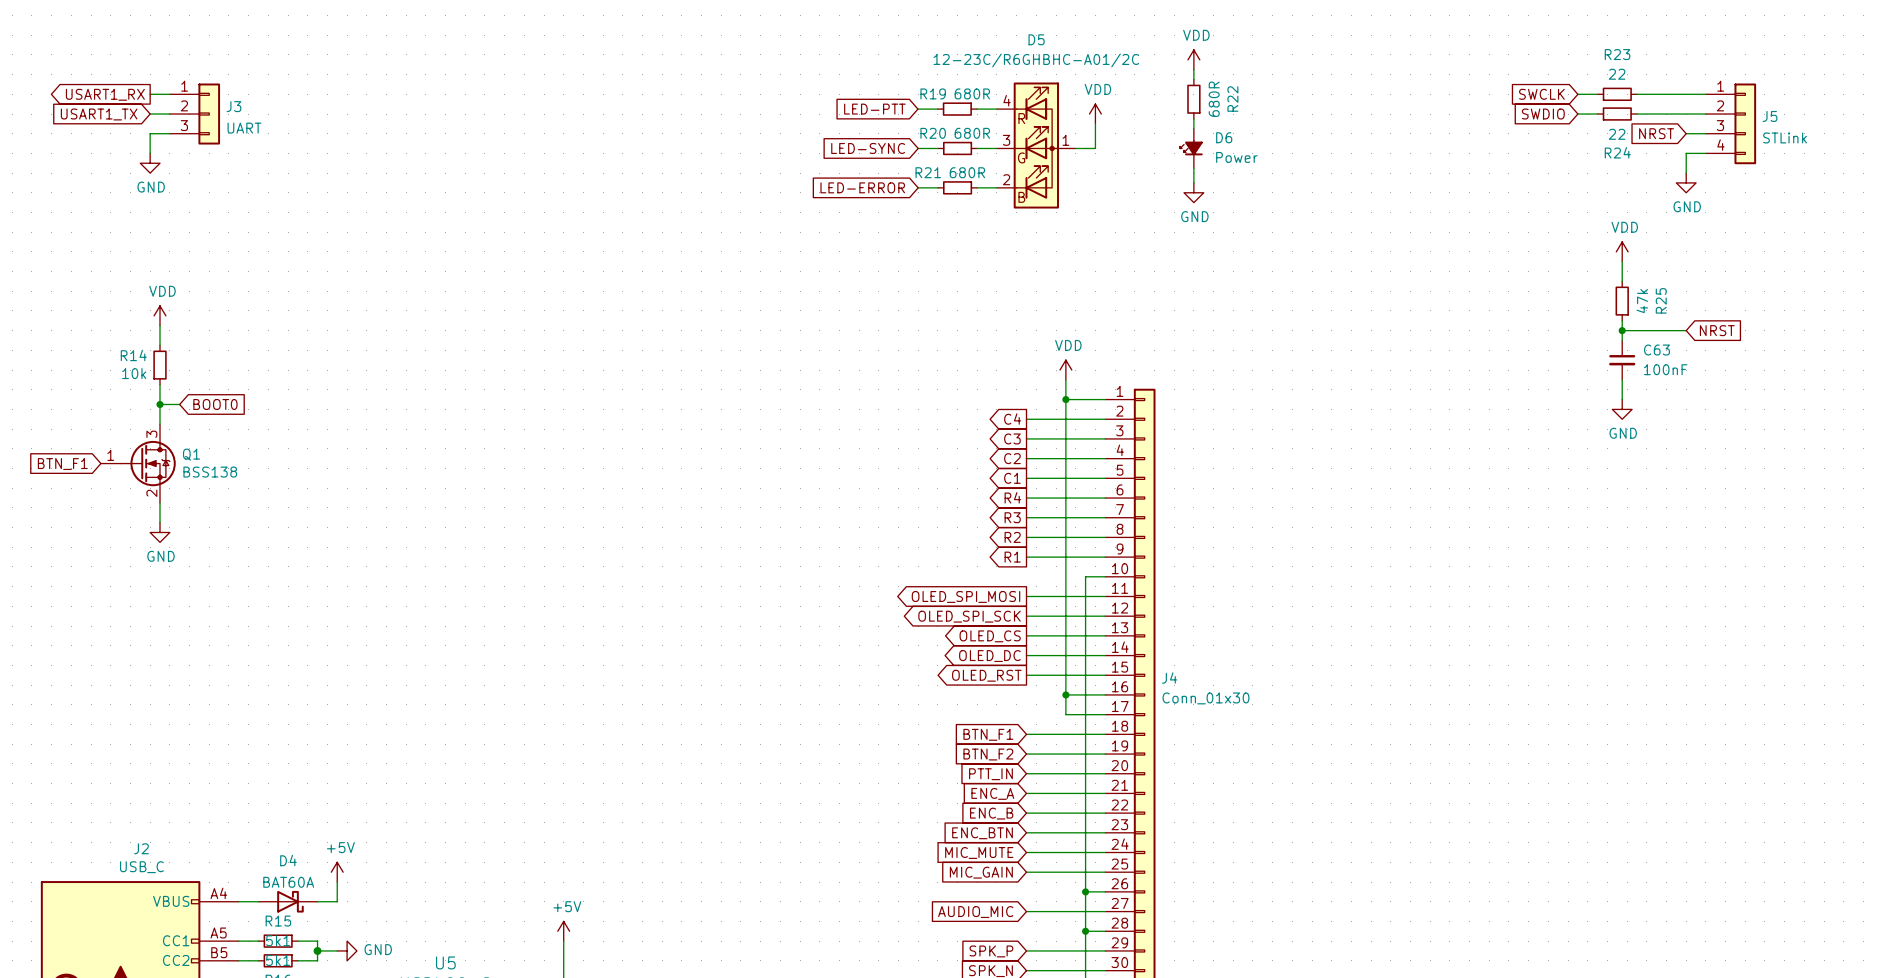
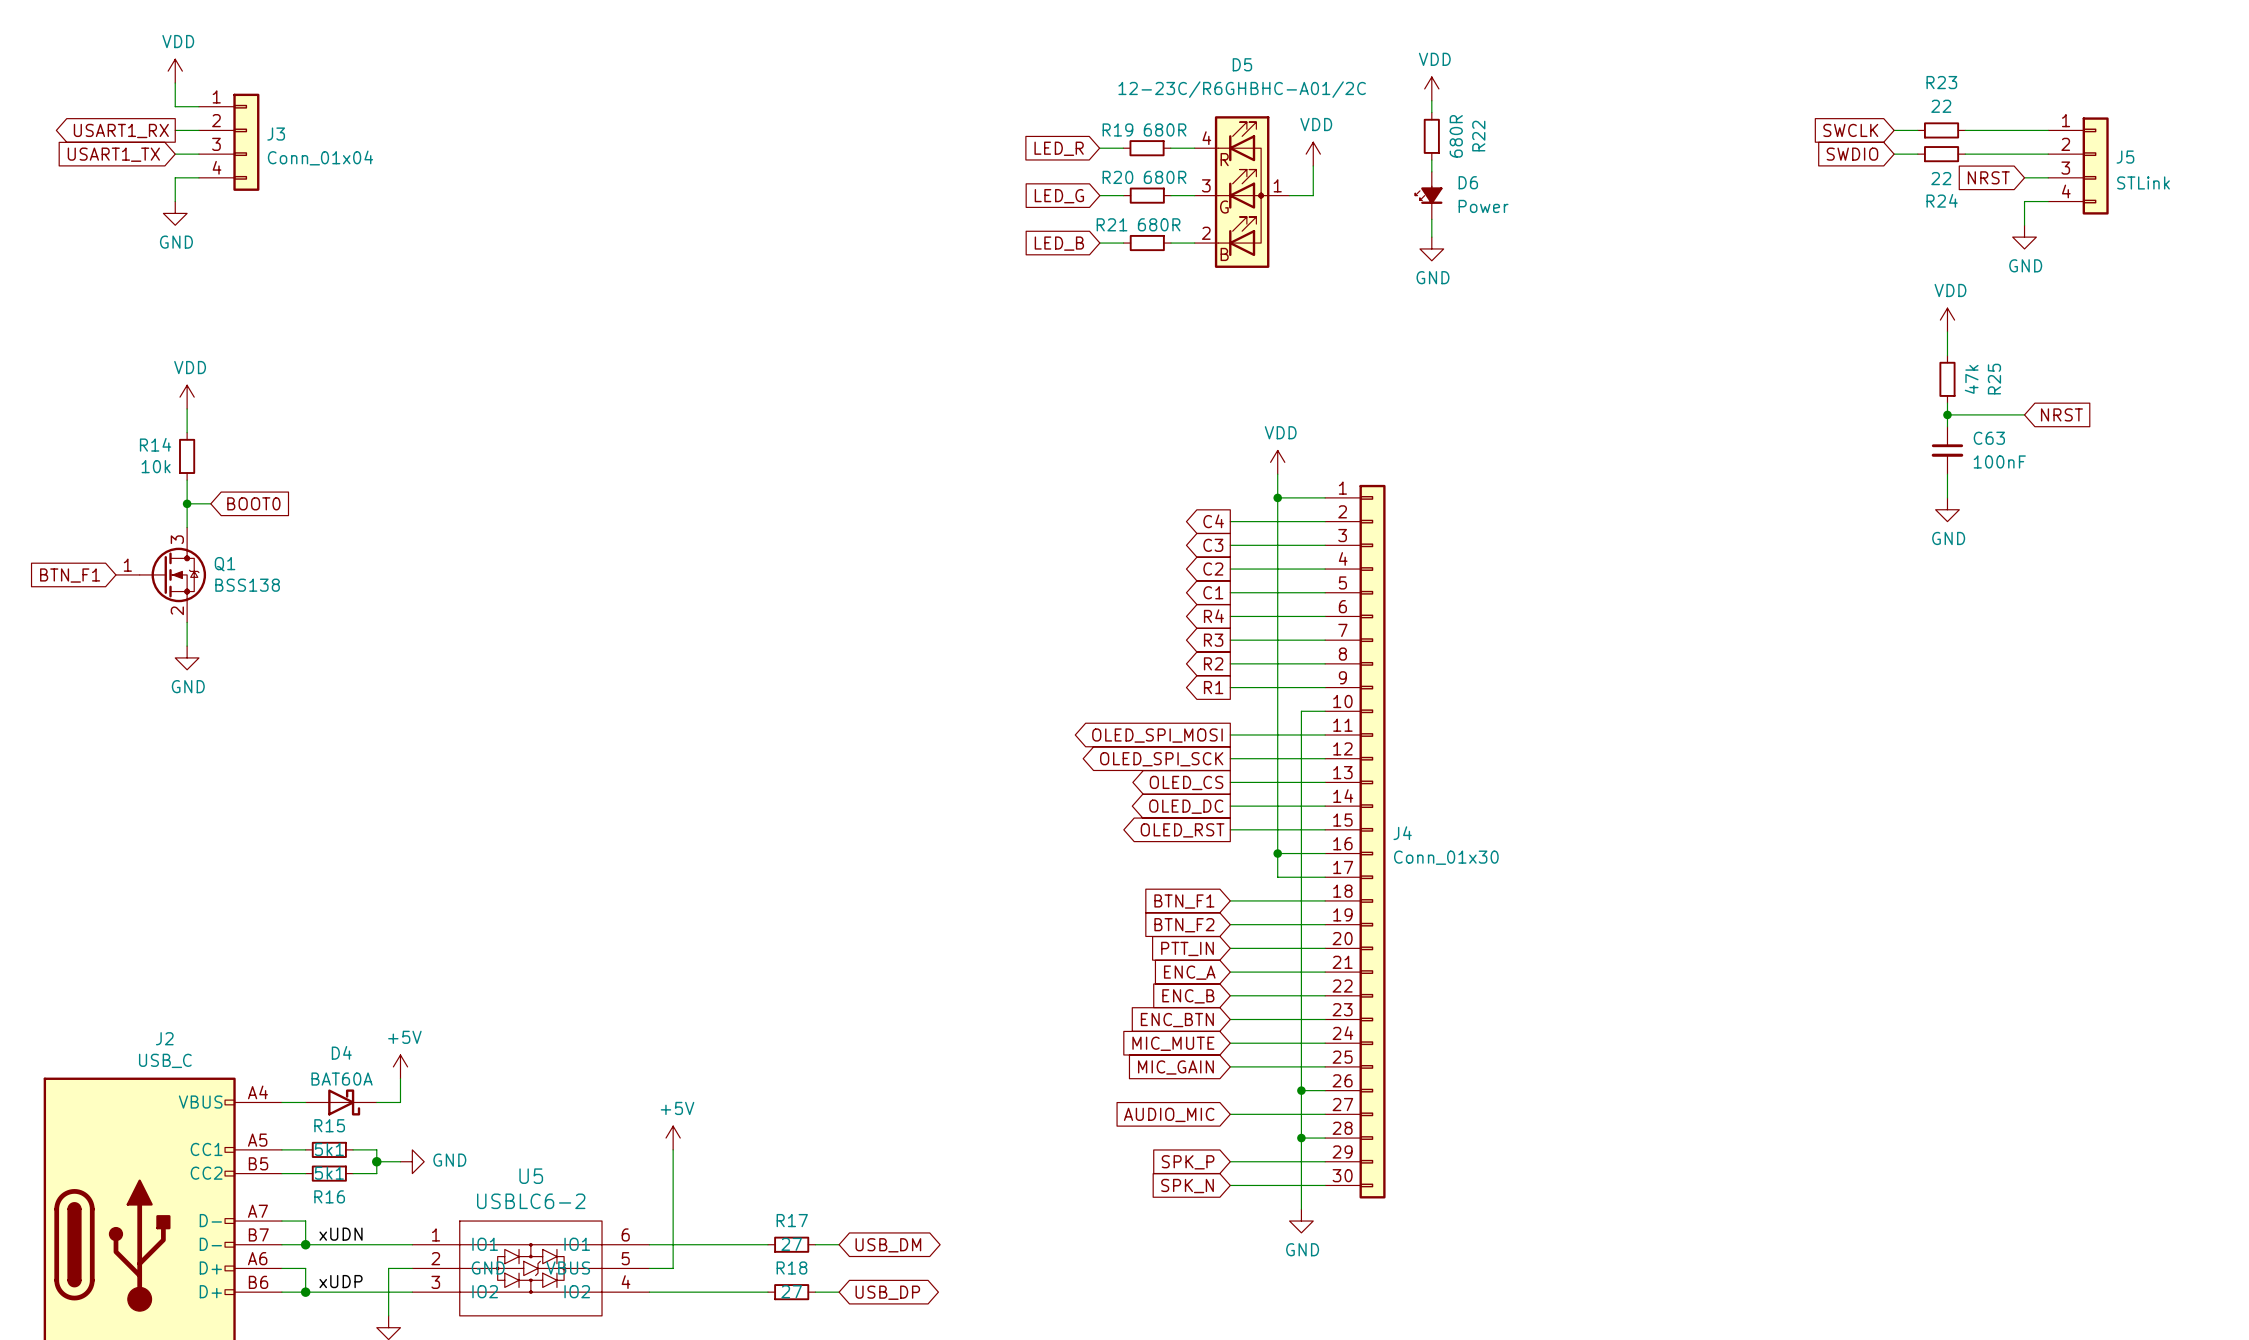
power symbol: none -> VDD (175, 71)
wire: none -> (175, 83) (175, 106) (198, 106)
J3 symbol: [169, 83, 221, 145] -> [198, 93, 260, 191]
global label: LED-PTT (874, 109) -> LED_R (1059, 148)
J3 value: UART (244, 128) -> Conn_01x04 (320, 158)
global label: LED-SYNC (868, 148) -> LED_G (1059, 196)
global label: LED-ERROR (862, 187) -> LED_B (1059, 243)

